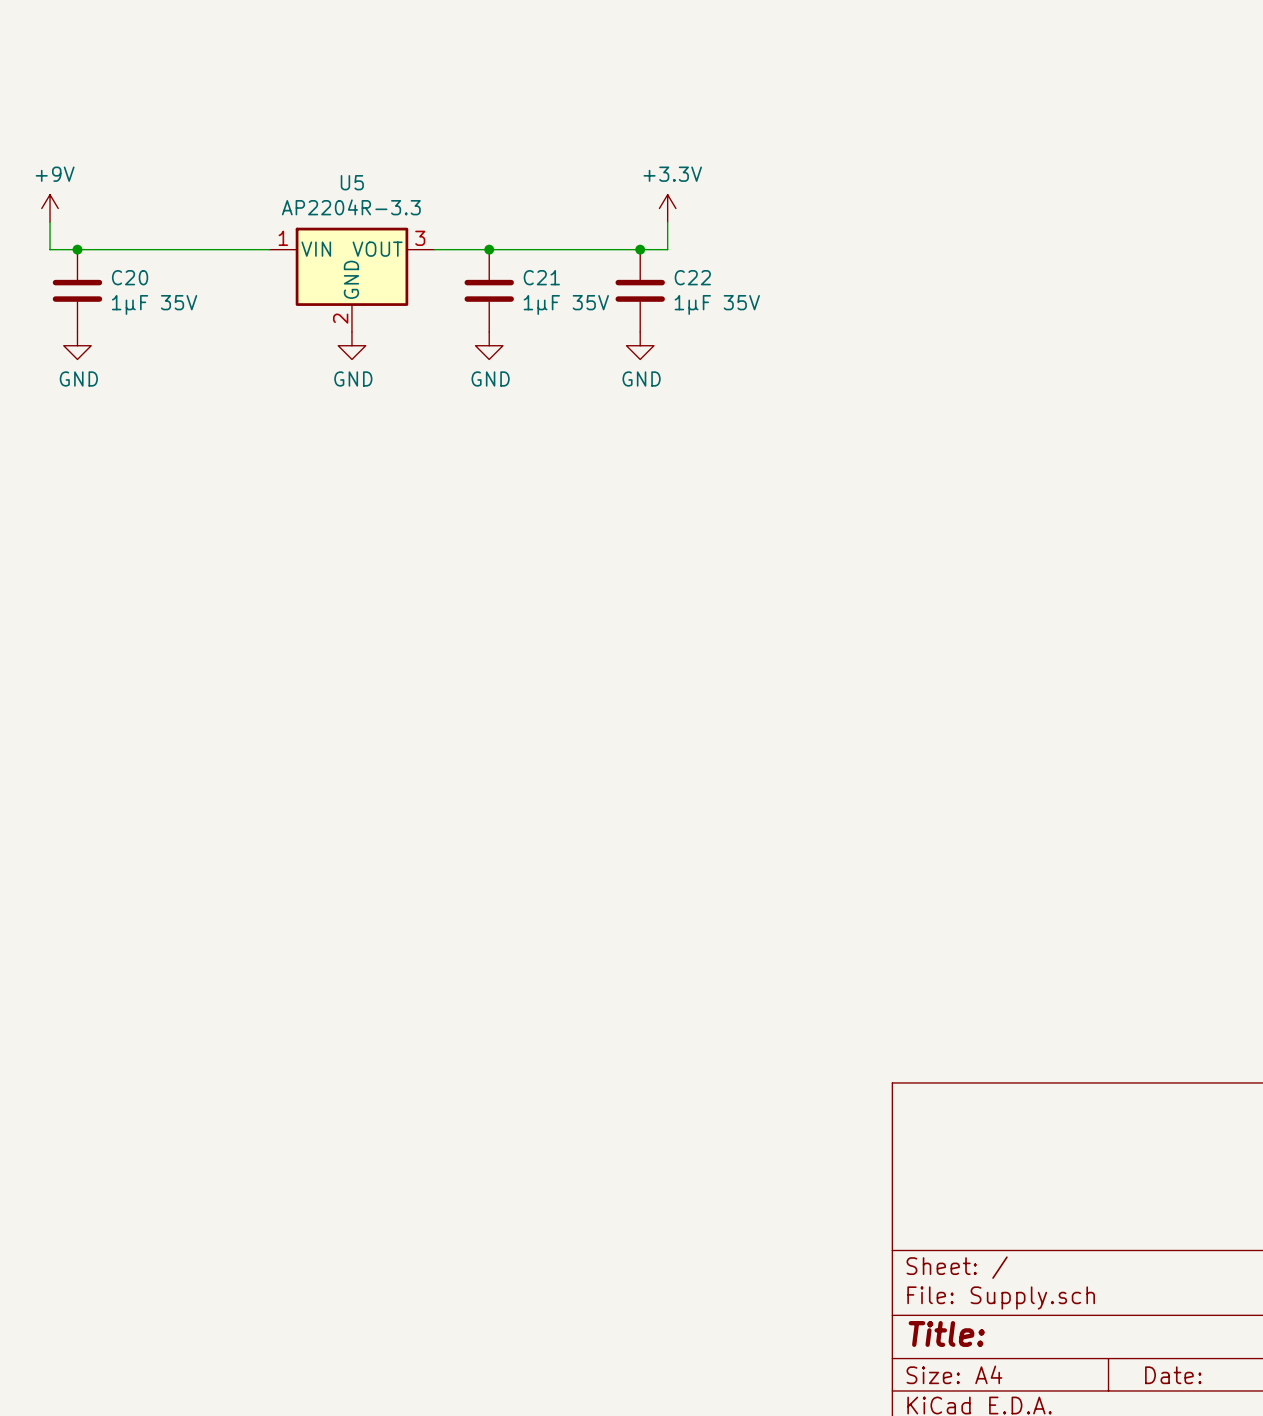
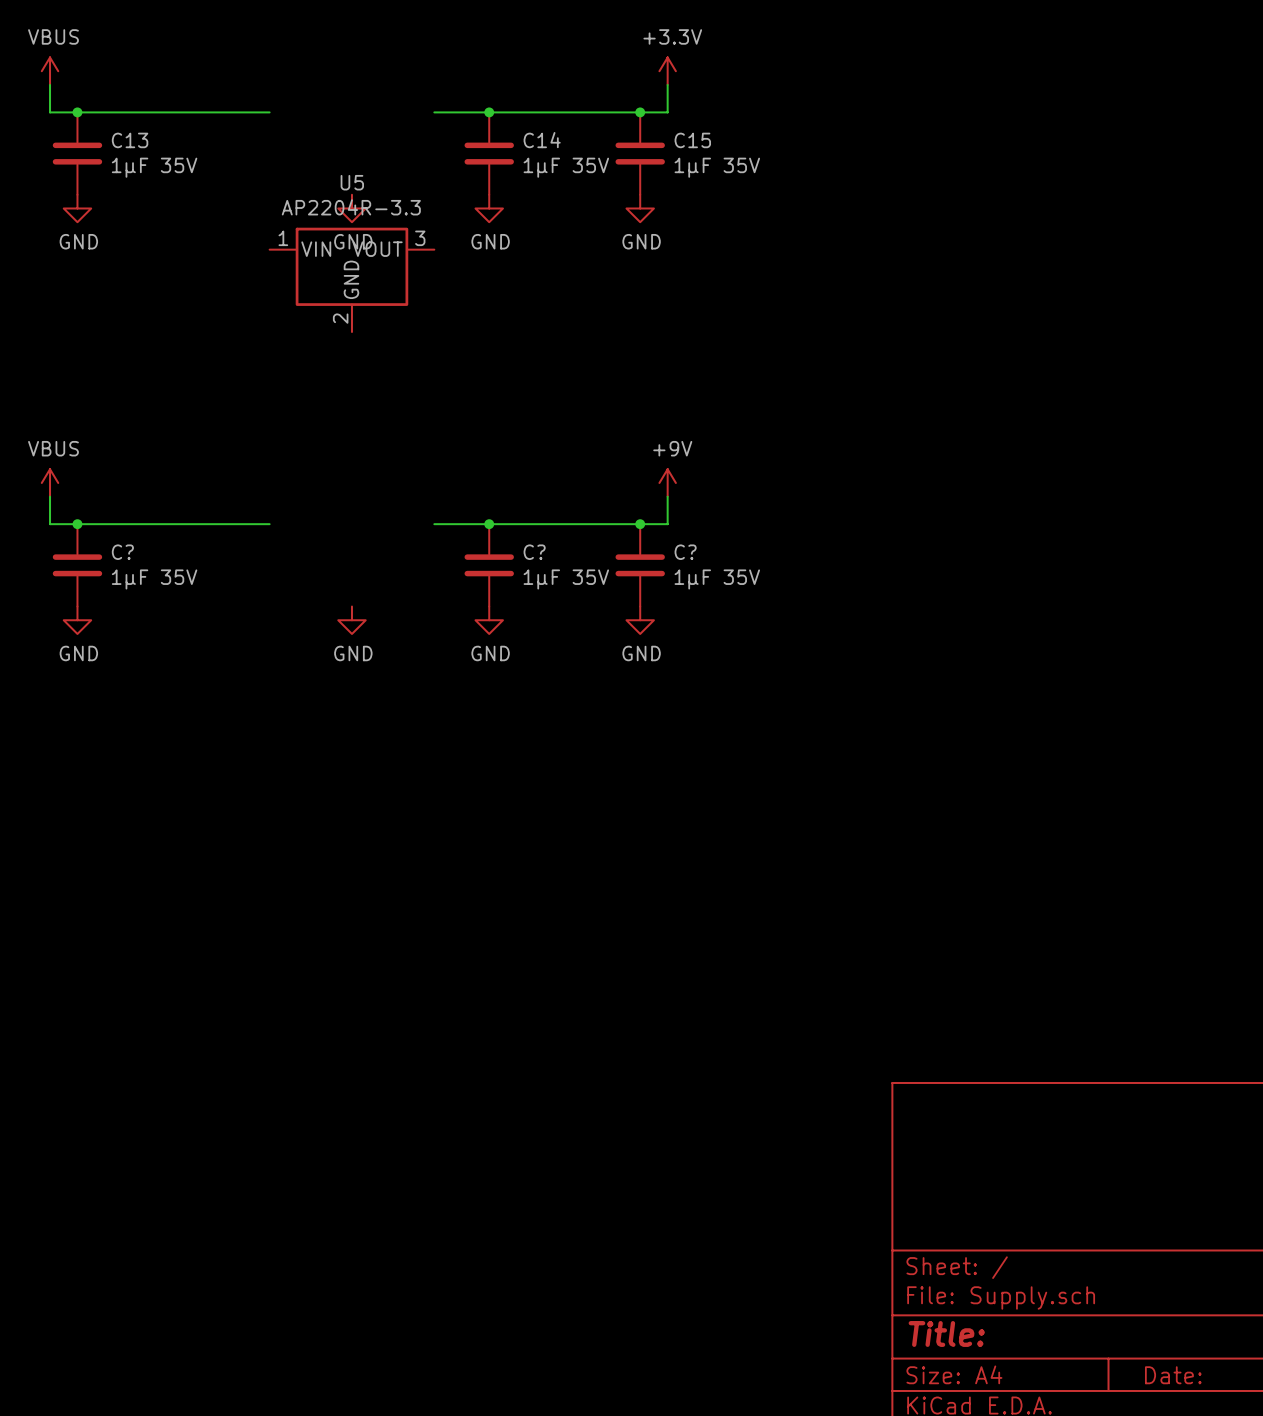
power symbol: none -> VBUS (50, 71)
junction: none -> (77, 112)
junction: none -> (489, 112)
junction: none -> (640, 112)
C13: none -> 1µF 35V (77, 153)
C14: none -> 1µF 35V (489, 153)
C15: none -> 1µF 35V (640, 153)
power symbol: +9V (50, 208) -> none
power symbol: none -> GND (77, 208)
power symbol: none -> GND (351, 208)
power symbol: none -> GND (489, 208)
power symbol: none -> GND (640, 208)
power symbol position: +3.3V (667, 208) -> +3.3V (667, 71)
wire: (50, 222) (50, 249) (269, 249) -> (50, 84) (50, 112) (269, 112)
wire: (667, 222) (667, 249) (434, 249) -> (667, 84) (667, 112) (434, 112)
junction: (77, 249) -> none
junction: (489, 249) -> none
junction: (640, 249) -> none
C20: 1µF 35V (77, 290) -> none
C21: 1µF 35V (489, 290) -> none
C22: 1µF 35V (640, 290) -> none
power symbol: GND (77, 345) -> none
power symbol: GND (351, 345) -> none
power symbol: GND (489, 345) -> none
power symbol: GND (640, 345) -> none
power symbol: none -> VBUS (50, 482)
power symbol: none -> +9V (667, 482)
wire: none -> (50, 496) (50, 524) (269, 524)
wire: none -> (667, 496) (667, 524) (434, 524)
junction: none -> (77, 524)
junction: none -> (489, 524)
junction: none -> (640, 524)
C?: none -> 1µF 35V (77, 565)
C?: none -> 1µF 35V (489, 565)
C?: none -> 1µF 35V (640, 565)
power symbol: none -> GND (77, 620)
power symbol: none -> GND (351, 620)
power symbol: none -> GND (489, 620)
power symbol: none -> GND (640, 620)

